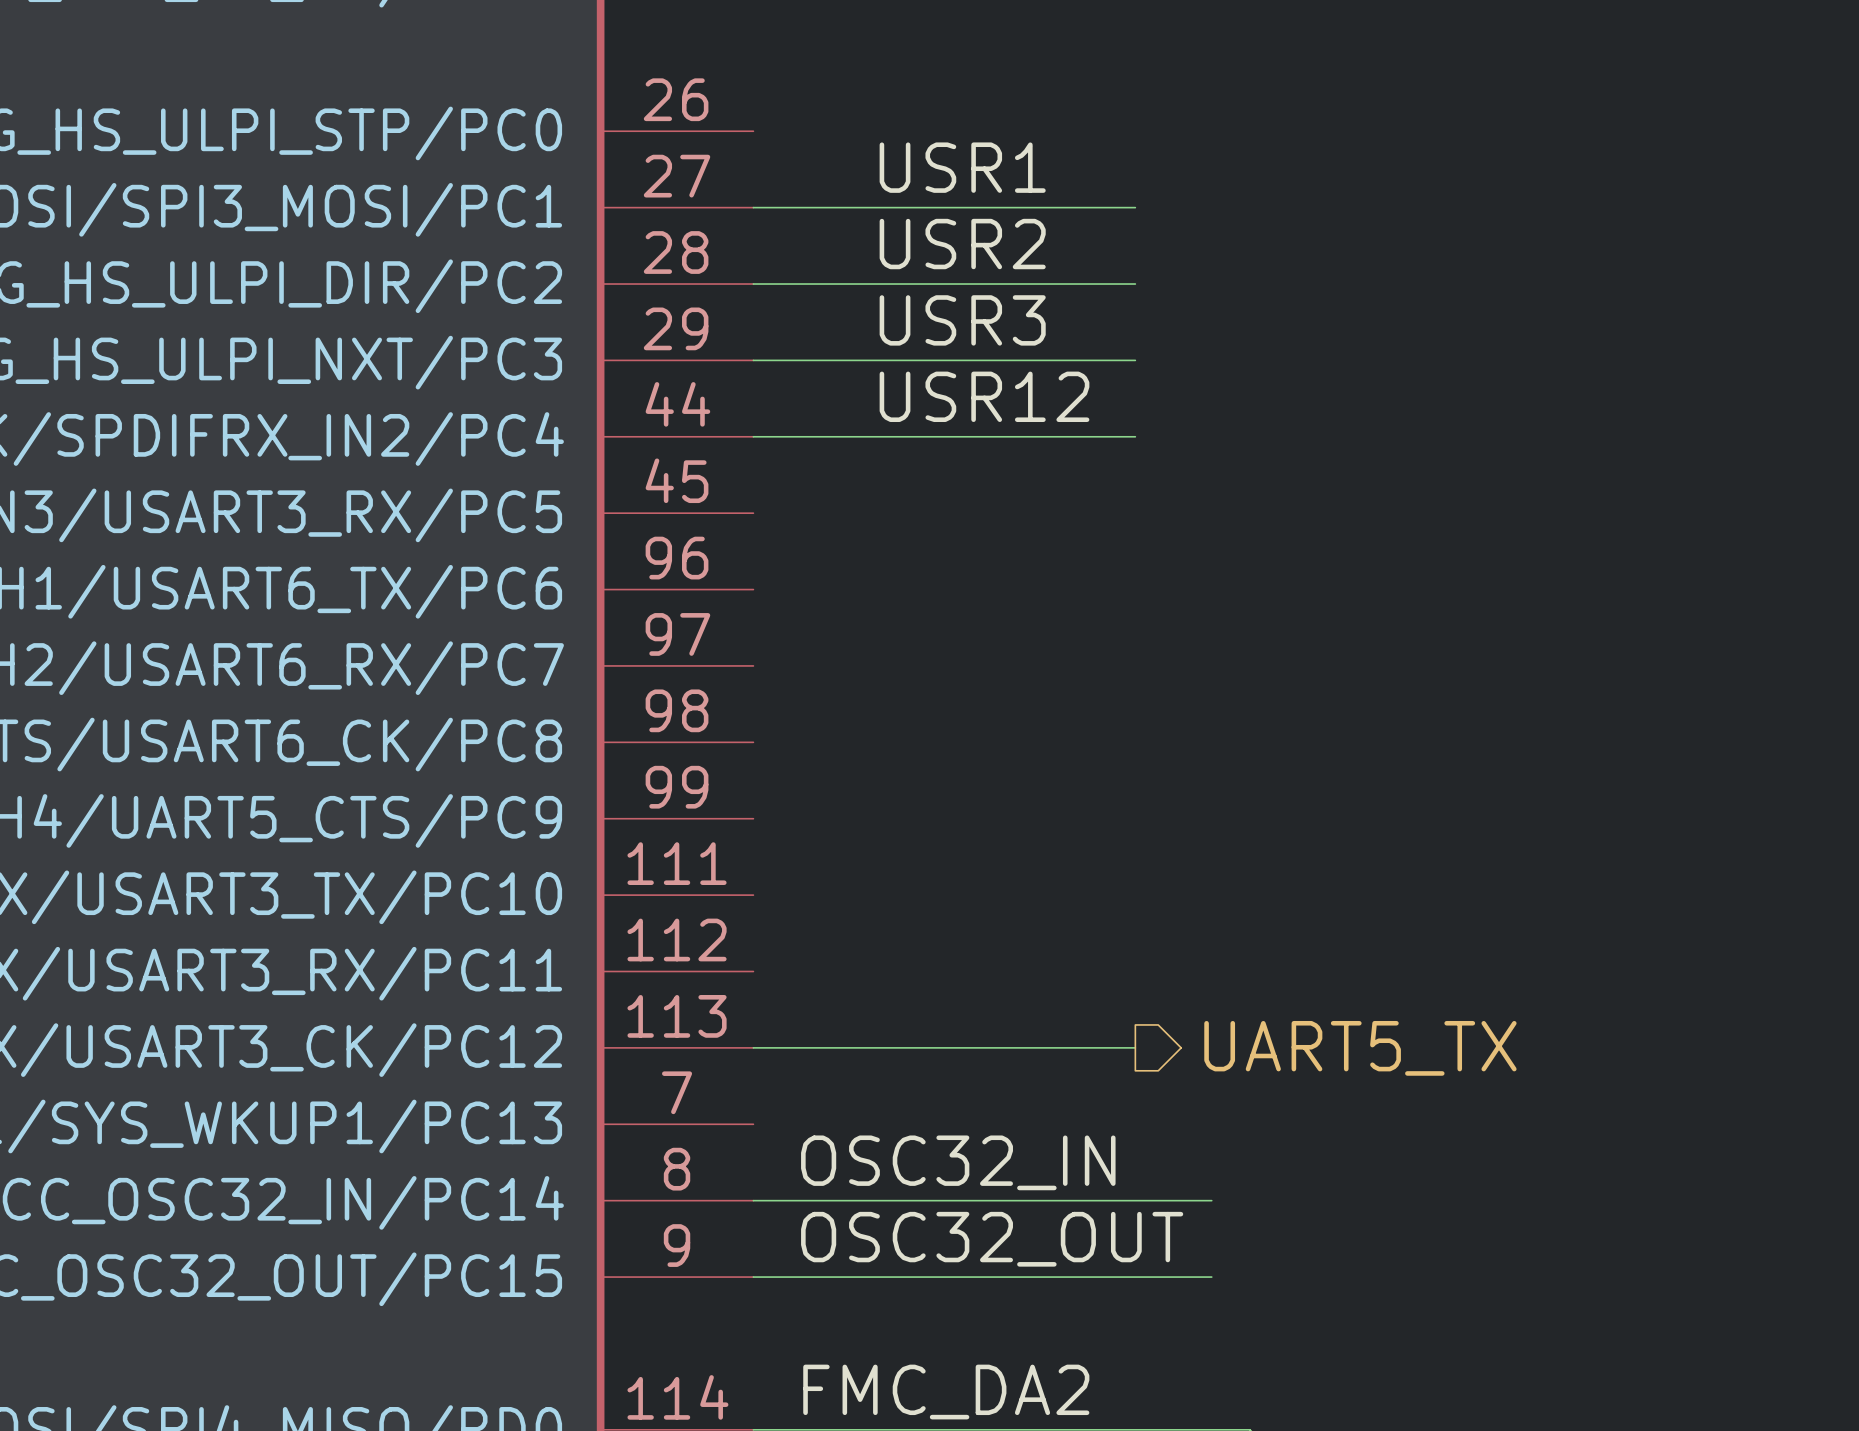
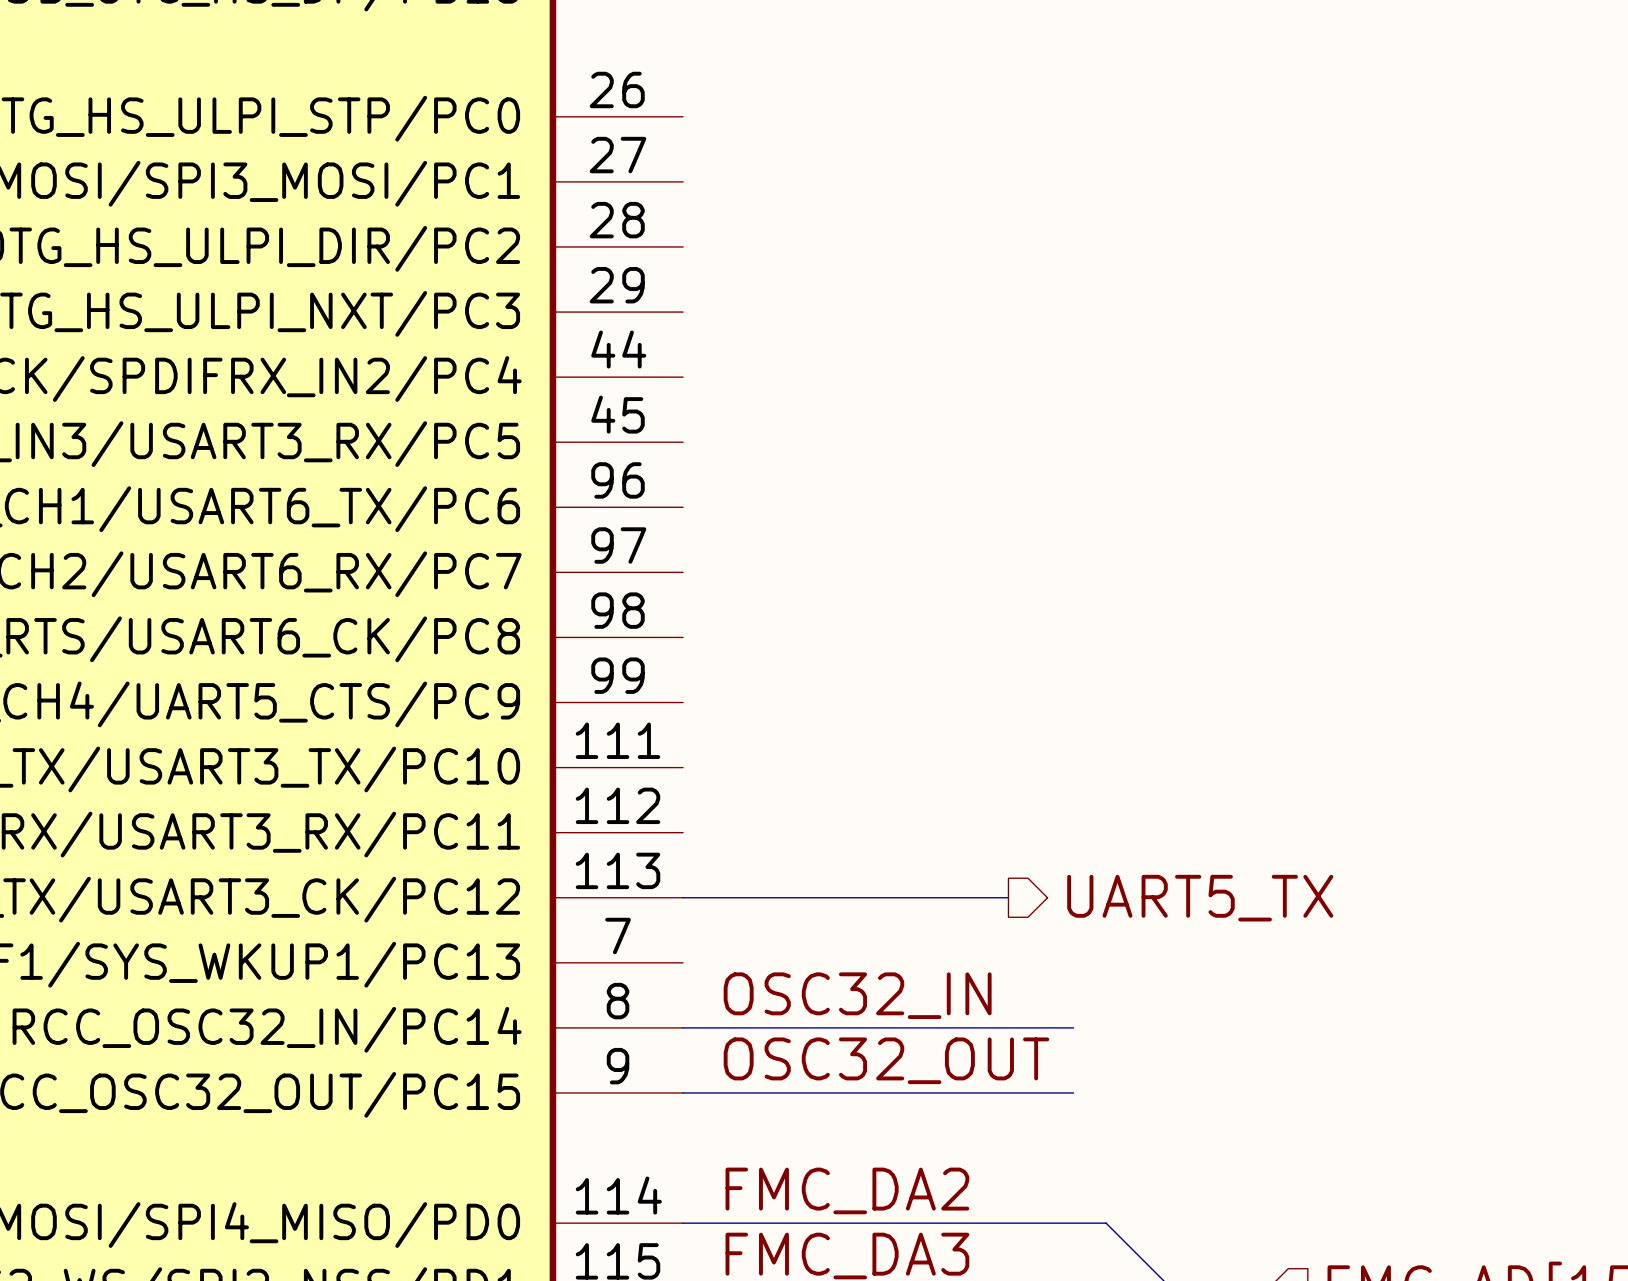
label: USR1 (962, 167) -> none
wire: (753, 207) (1135, 207) -> none
label: USR2 (962, 244) -> none
wire: (753, 284) (1135, 284) -> none
label: USR3 (962, 320) -> none
wire: (753, 360) (1135, 360) -> none
label: USR12 (984, 396) -> none
wire: (753, 436) (1135, 436) -> none

